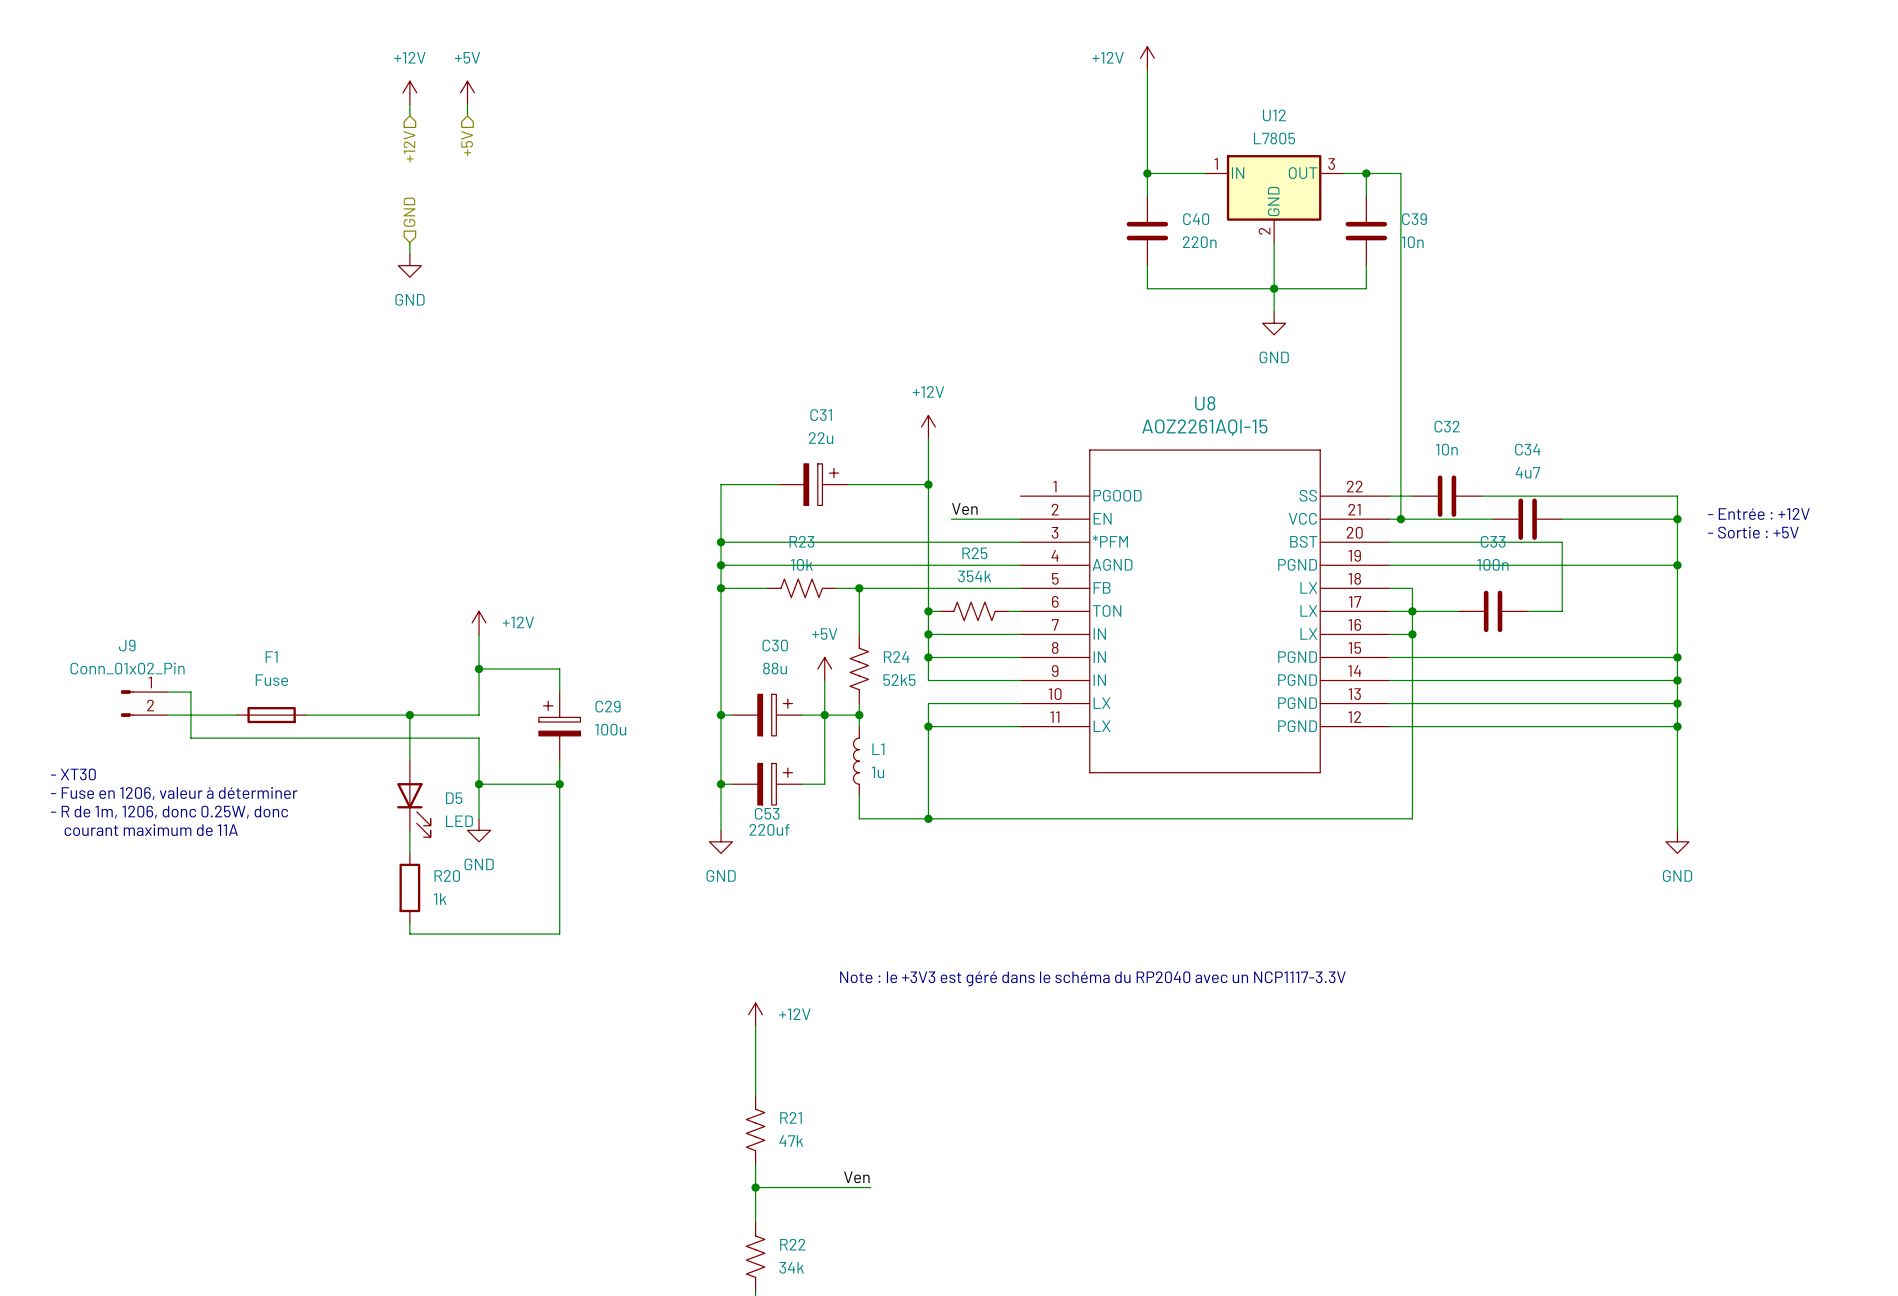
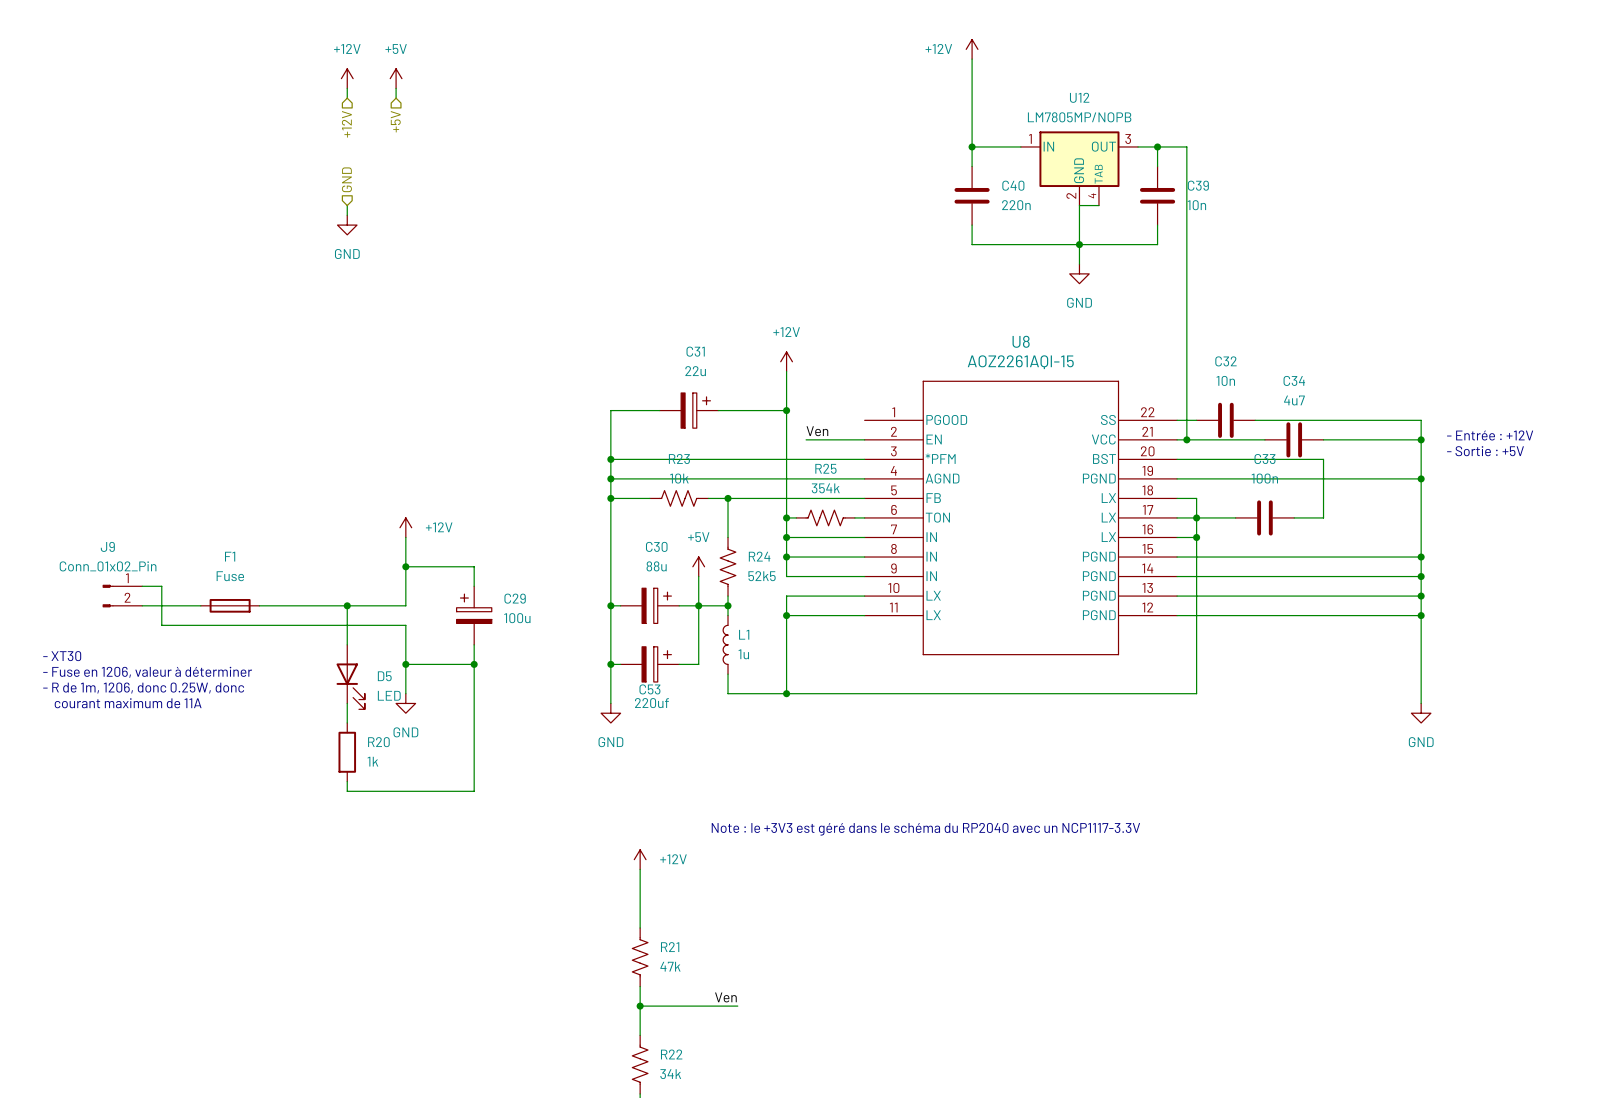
U12 value: L7805 (1274, 138) -> LM7805MP/NOPB (1079, 117)
U12 symbol: [1205, 155, 1344, 243] -> [1020, 131, 1139, 206]
wire: none -> (1079, 205) (1098, 205)

